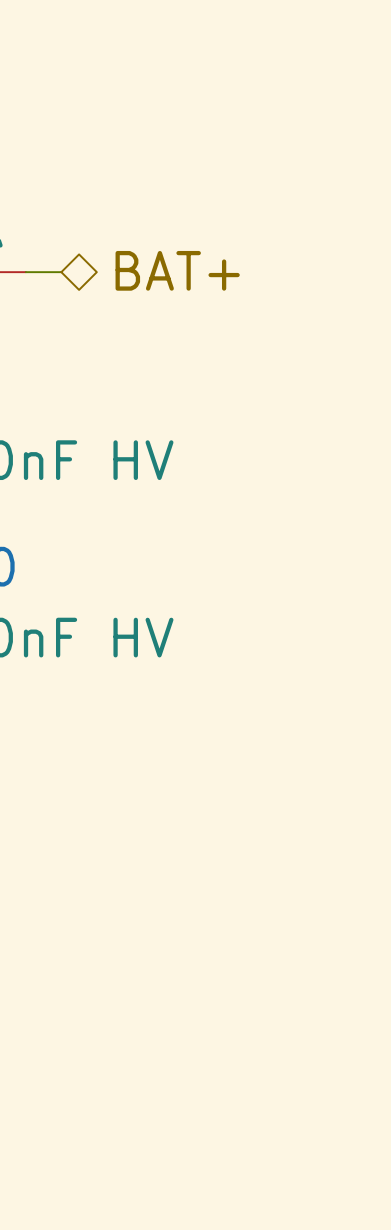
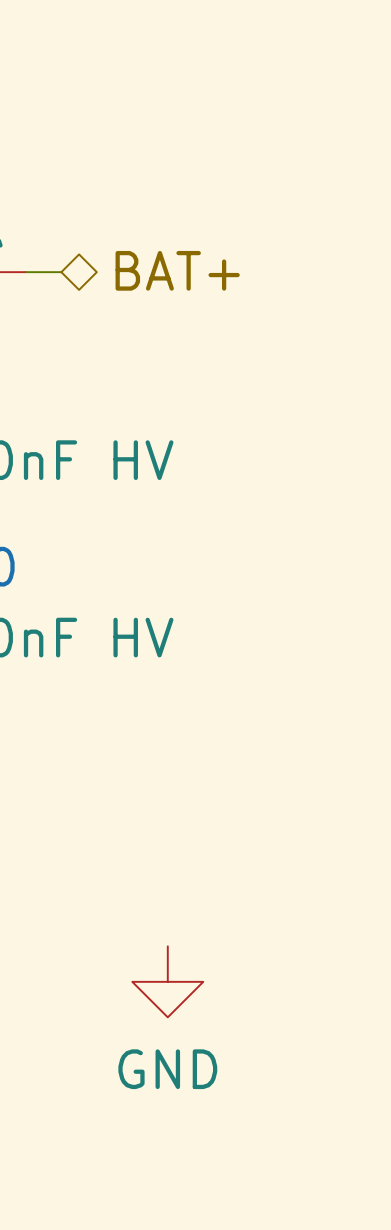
power symbol: none -> GND (167, 981)

